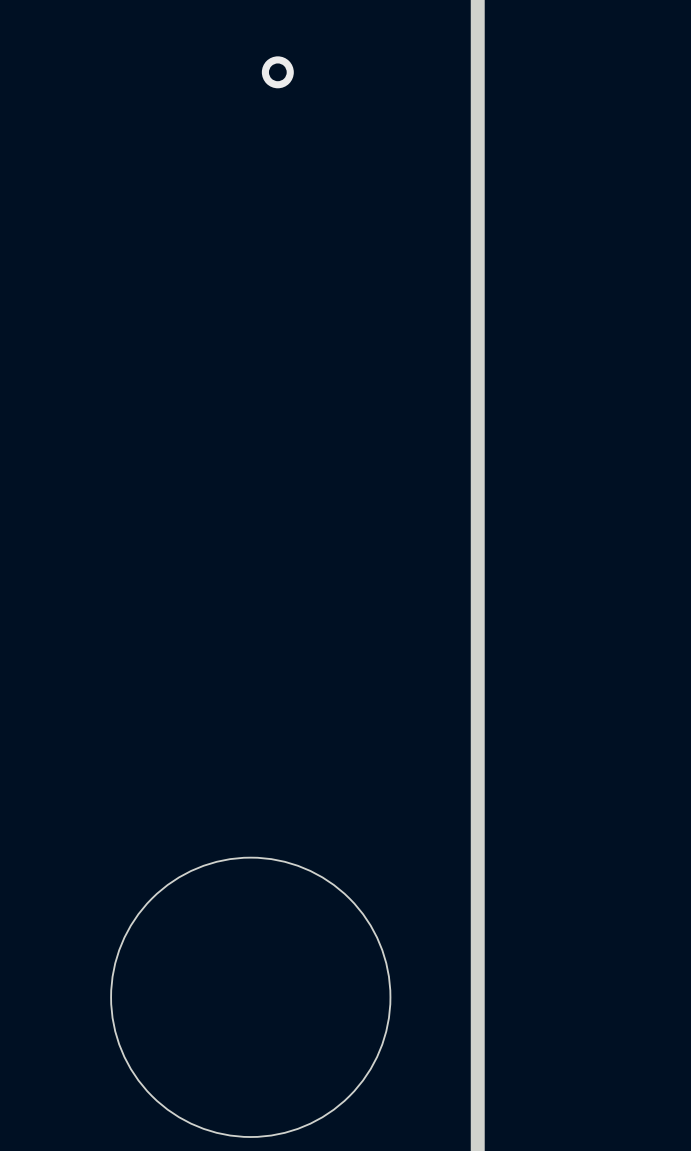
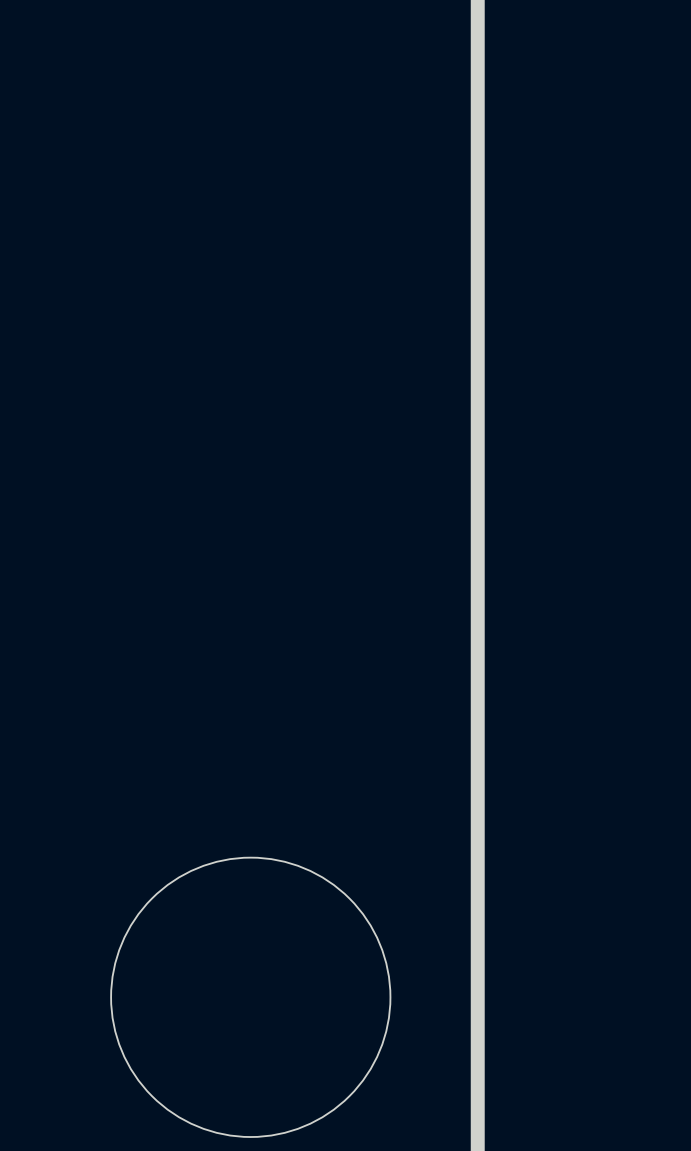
via: (277, 72) -> none

